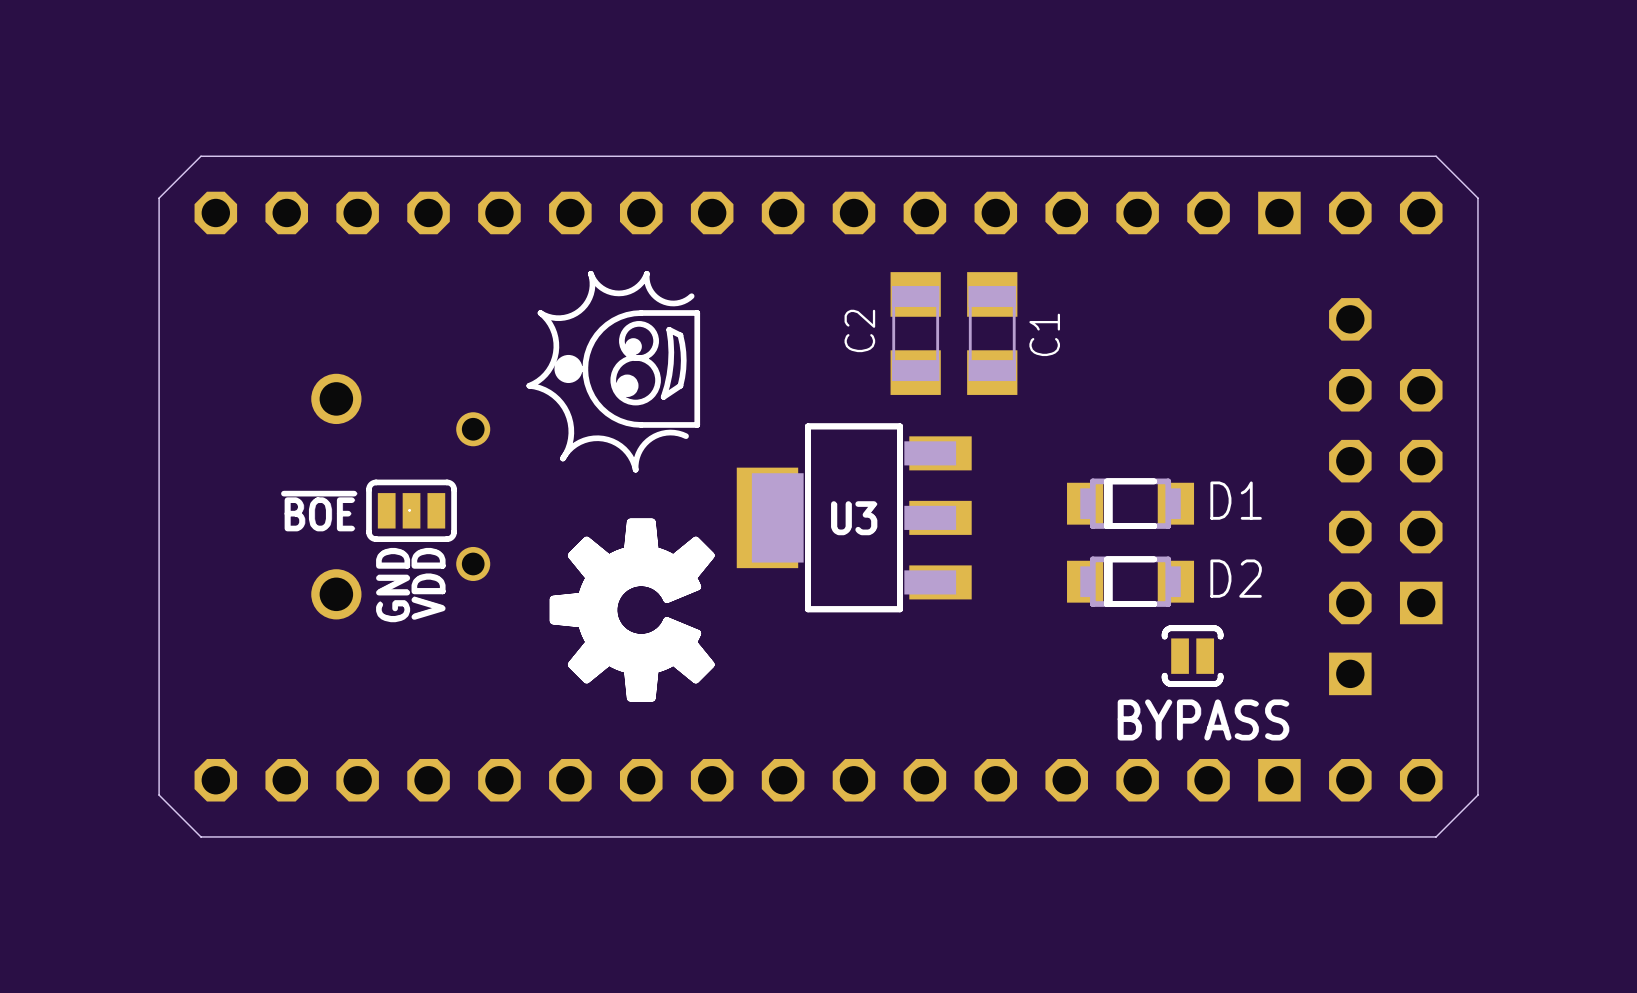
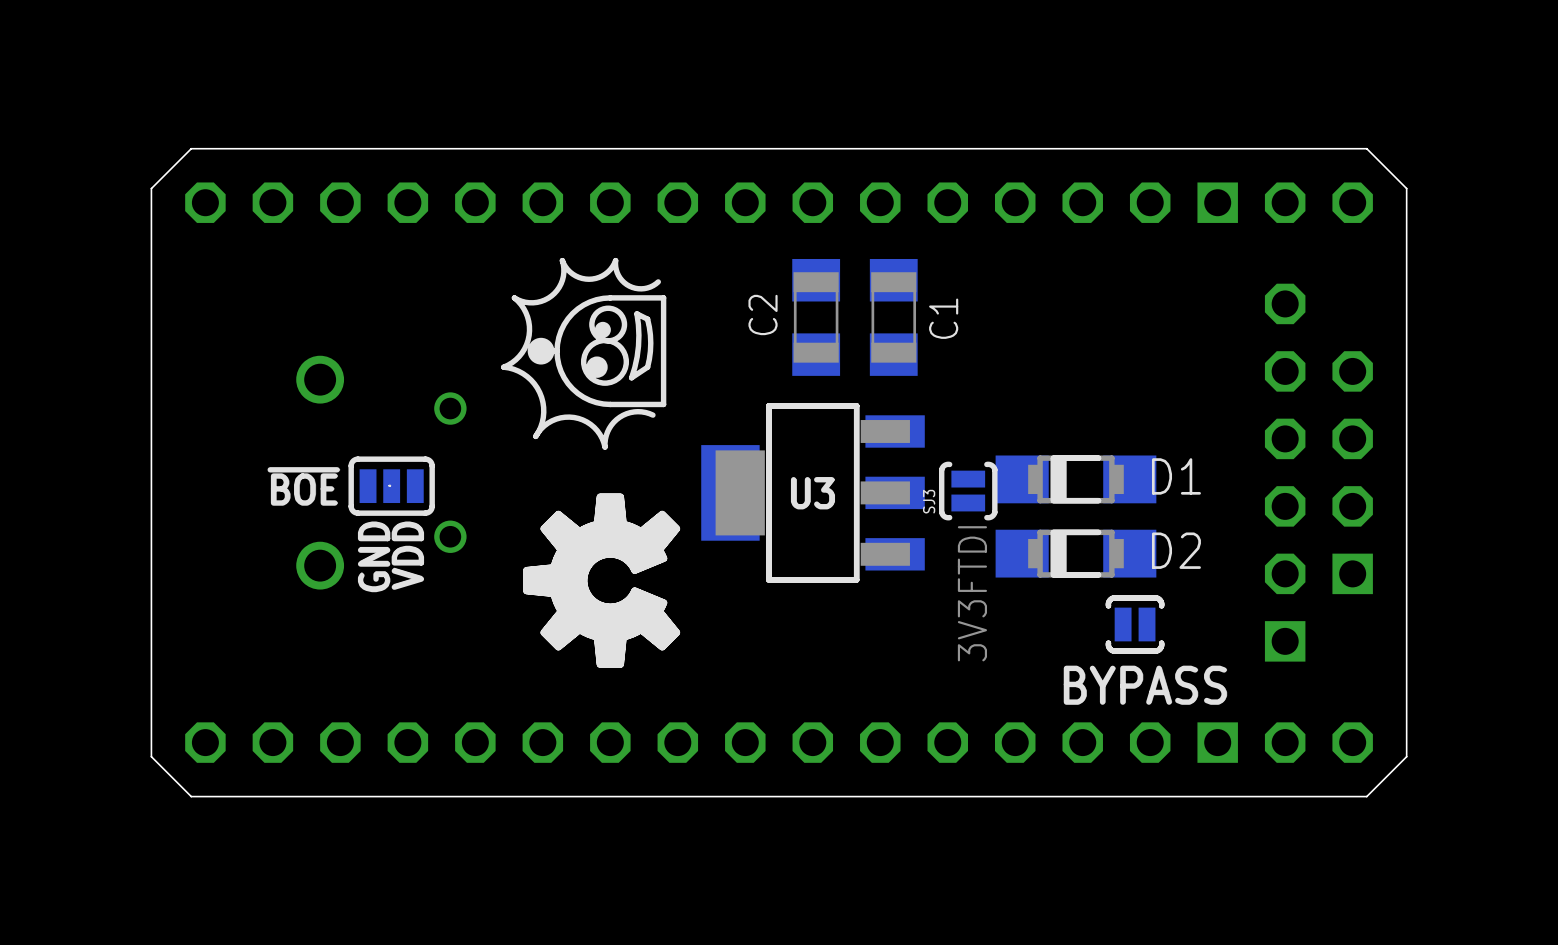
C2 position: (915, 333) -> (816, 317)
C1 position: (992, 333) -> (893, 317)
D1 footprint: [1067, 478, 1195, 529] -> [995, 455, 1157, 504]
SJ3: none -> 3V3FTDI (968, 491)
D2 footprint: [1067, 556, 1195, 607] -> [995, 529, 1157, 578]

